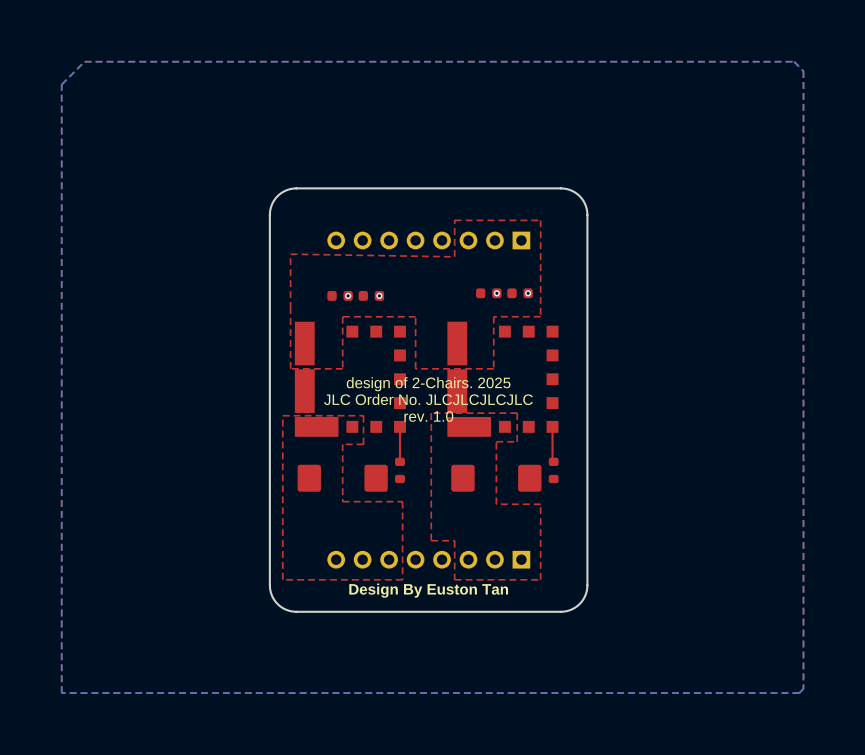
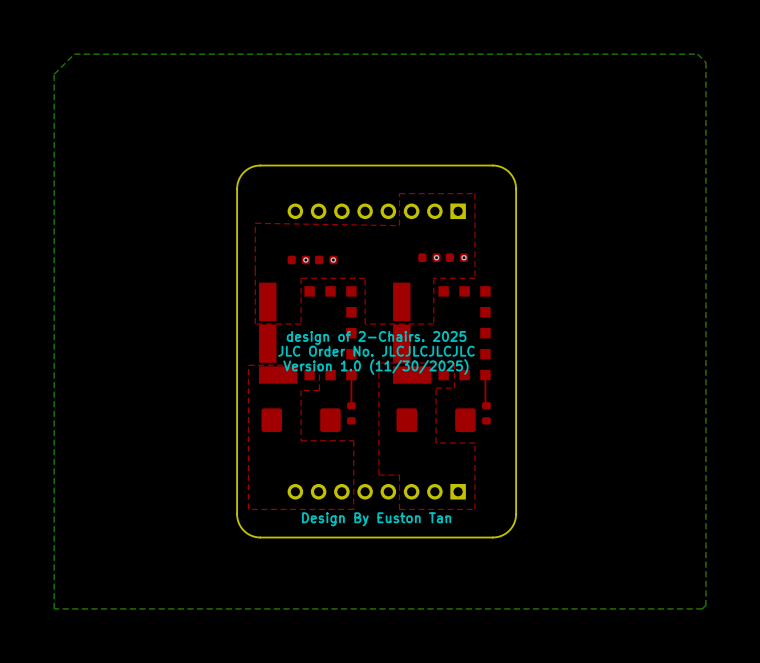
text: rev. 1.0 (428, 416) -> Version 1.0 (11/30/2025) (375, 367)

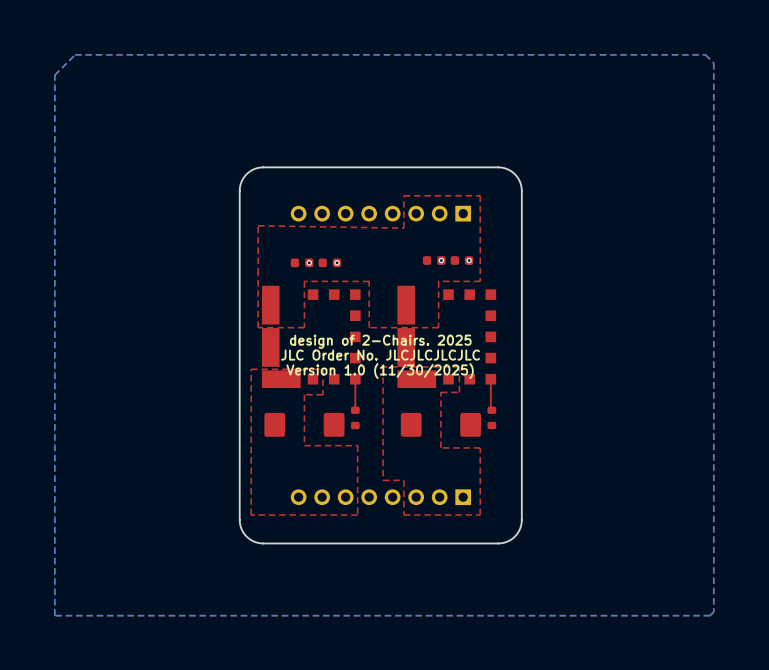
text: Design By Euston Tan (376, 519) -> none

